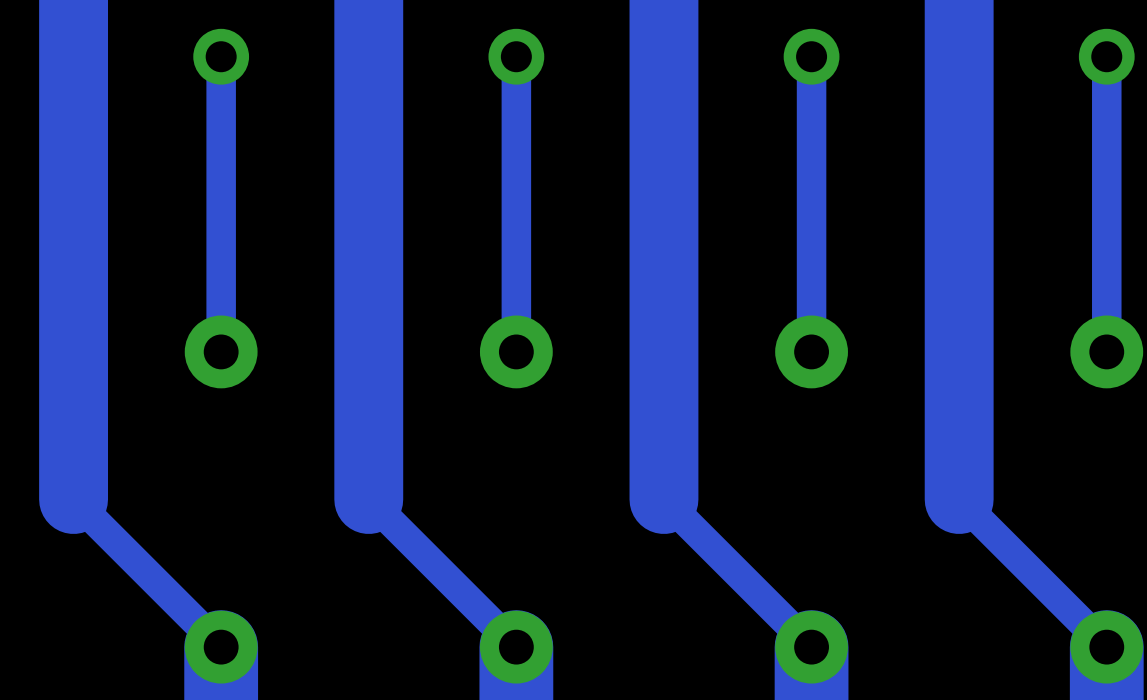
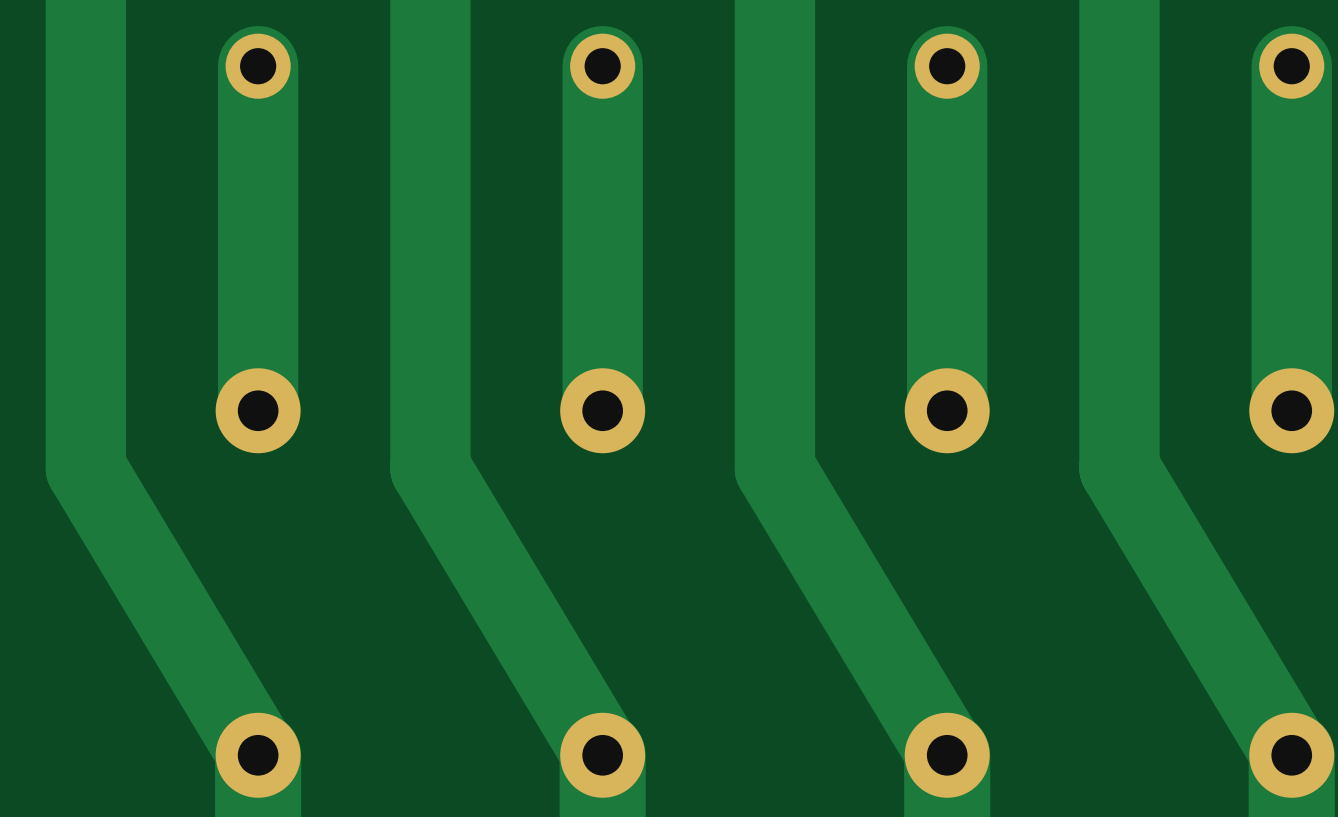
track width: thin (221, 56) (221, 351) -> thick (258, 66) (258, 410)
track width: thin (516, 56) (516, 351) -> thick (602, 66) (602, 410)
track width: thin (811, 56) (811, 351) -> thick (947, 66) (947, 410)
track width: thin (1106, 56) (1106, 351) -> thick (1291, 66) (1291, 410)
track: (73, 401) (73, 499) (221, 647) -> (85, 468) (258, 755)
track: (368, 401) (368, 499) (516, 647) -> (430, 468) (602, 755)
track: (663, 401) (663, 499) (811, 647) -> (774, 468) (947, 755)
track: (959, 401) (959, 499) (1106, 647) -> (1119, 468) (1291, 755)

